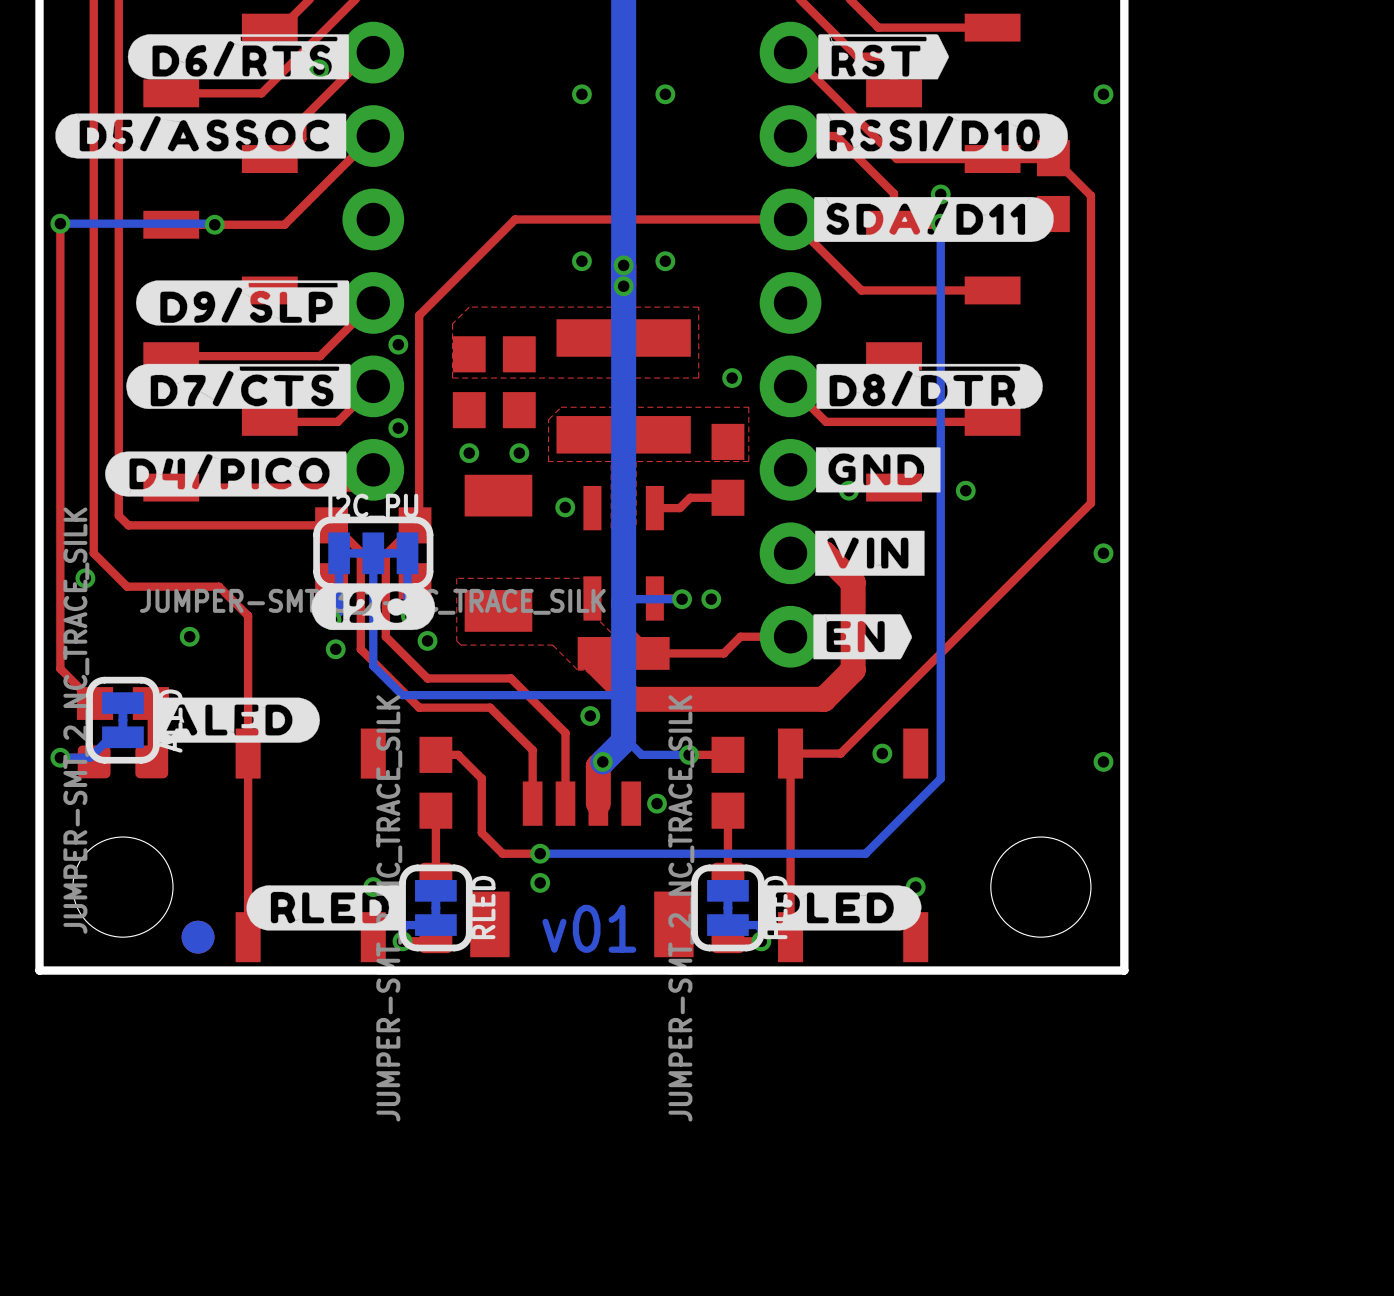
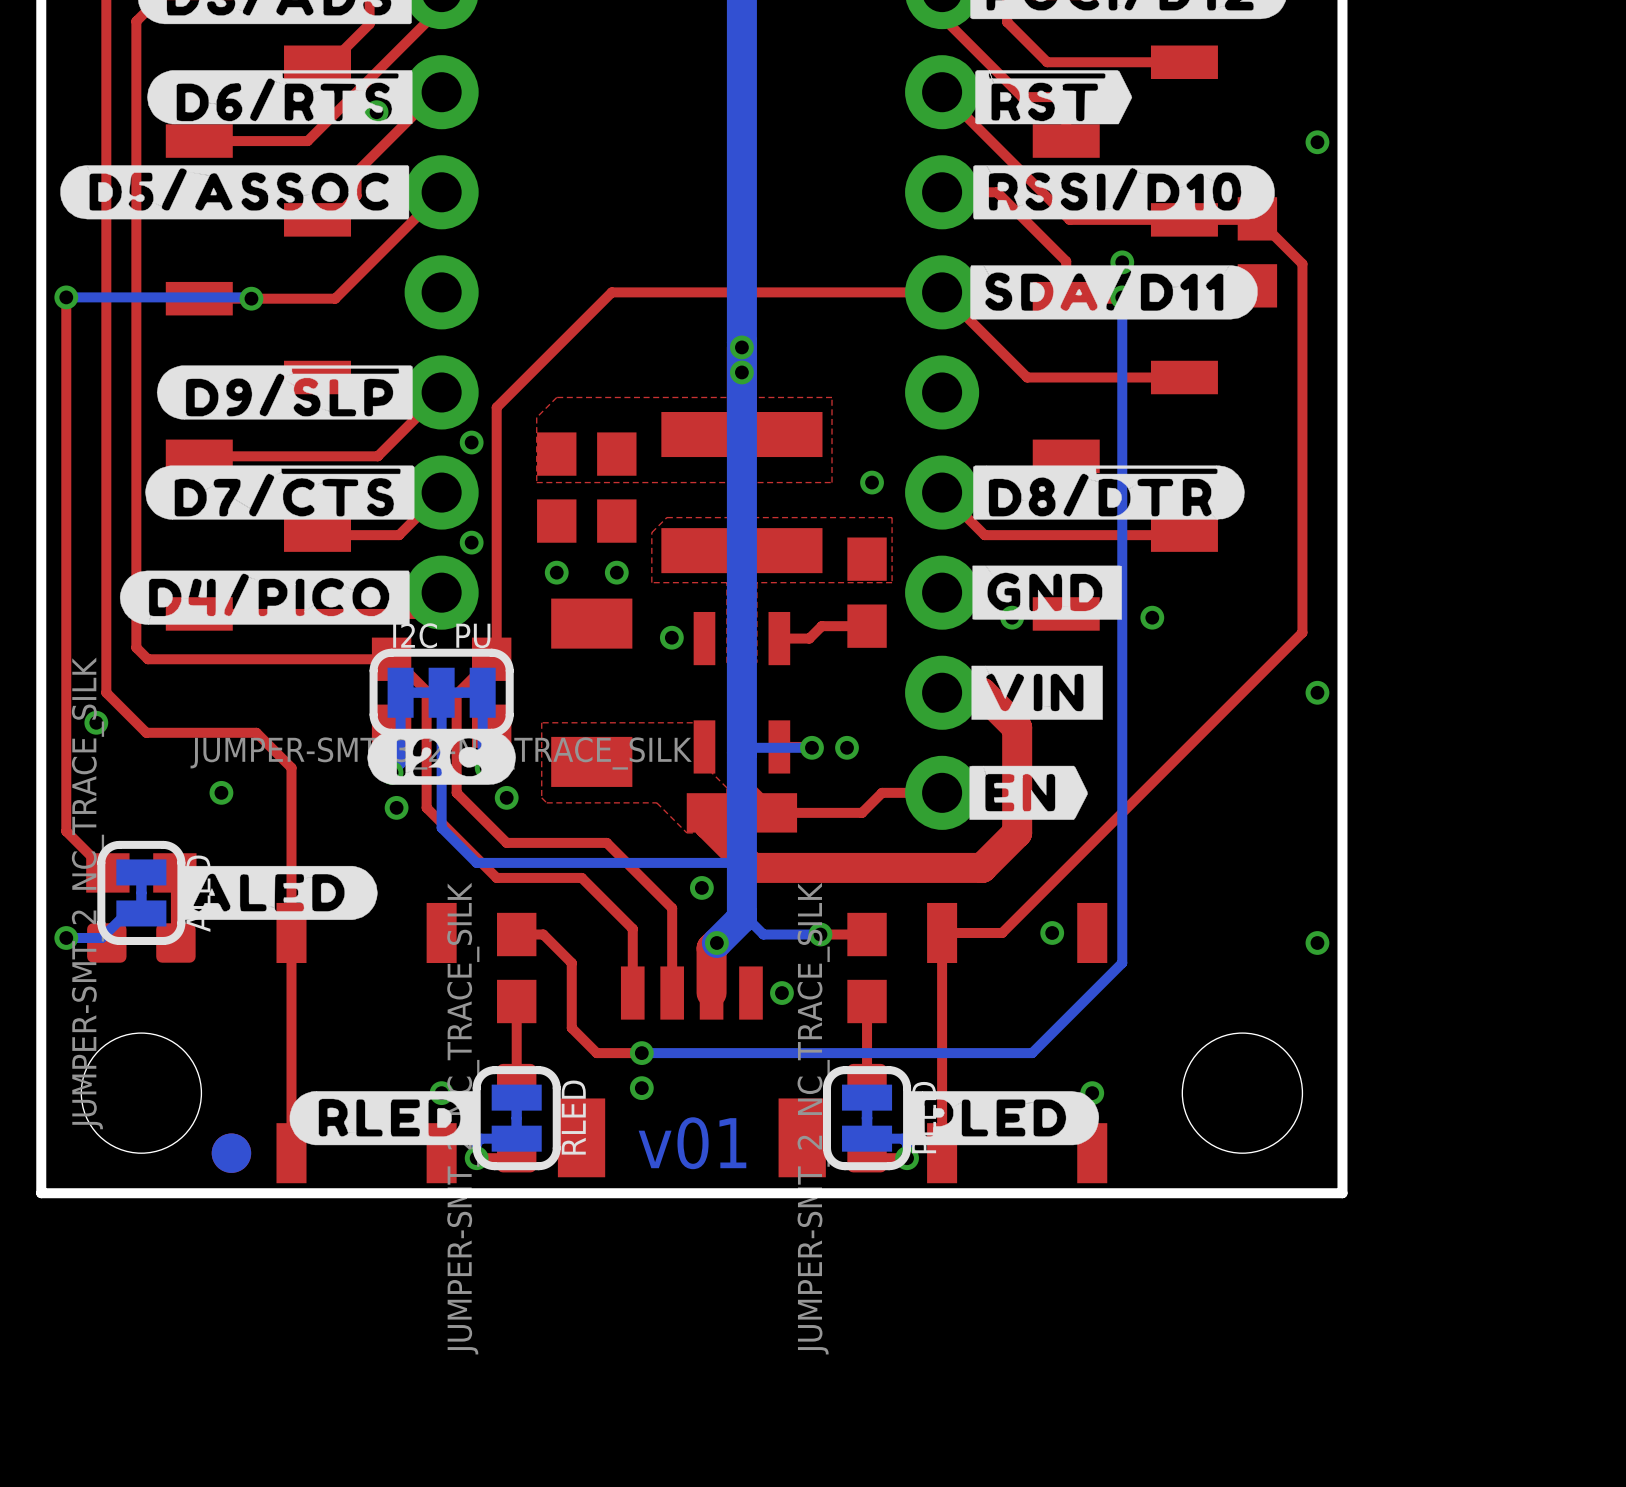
via: (581, 94) -> none
via: (665, 94) -> none
via: (581, 261) -> none
via: (665, 261) -> none

